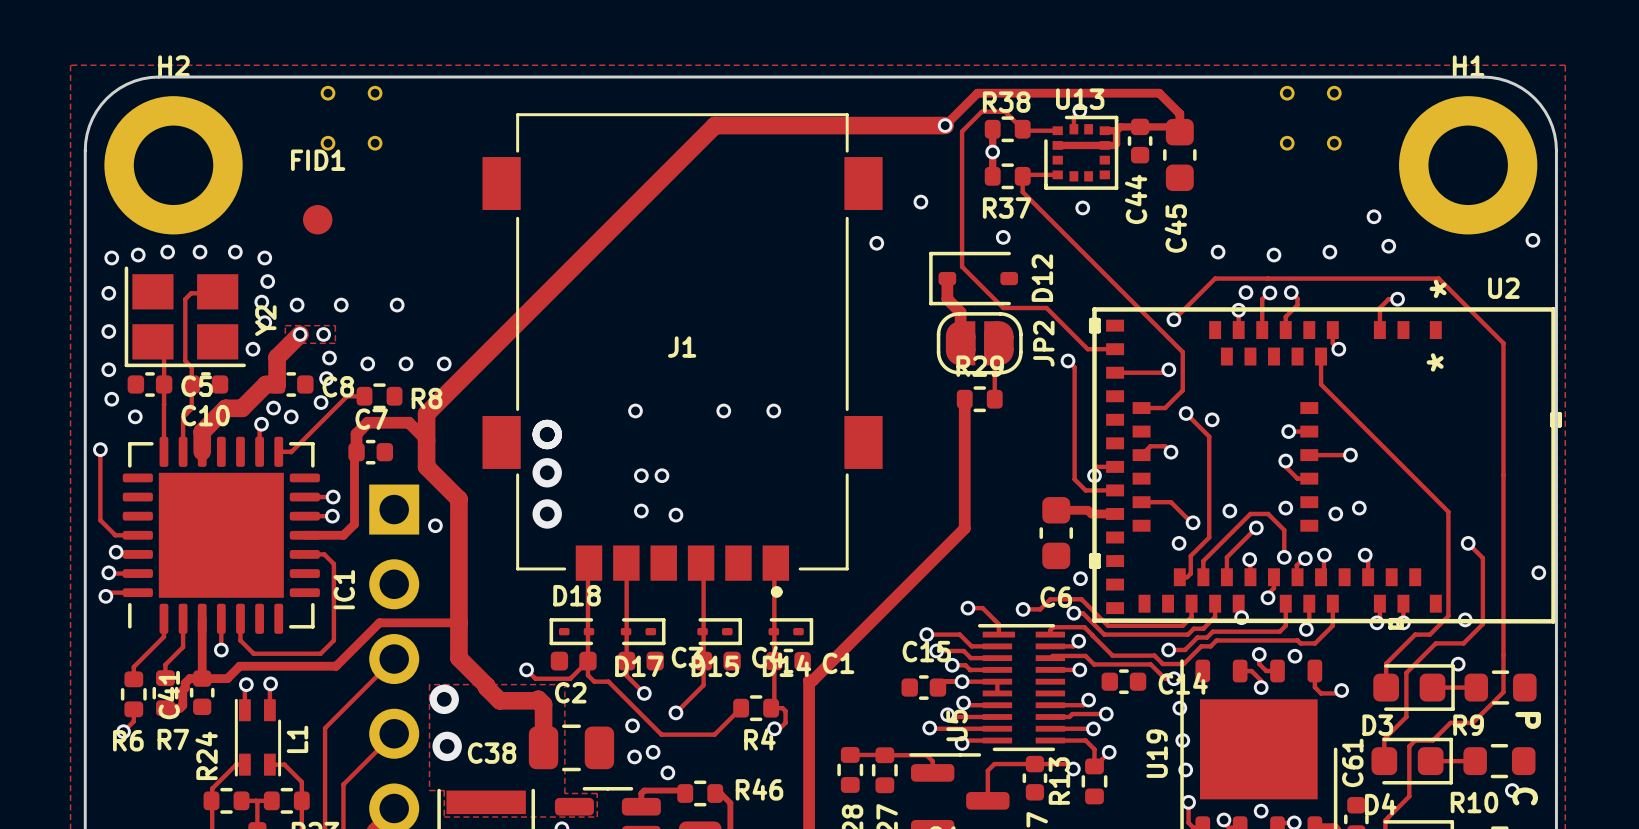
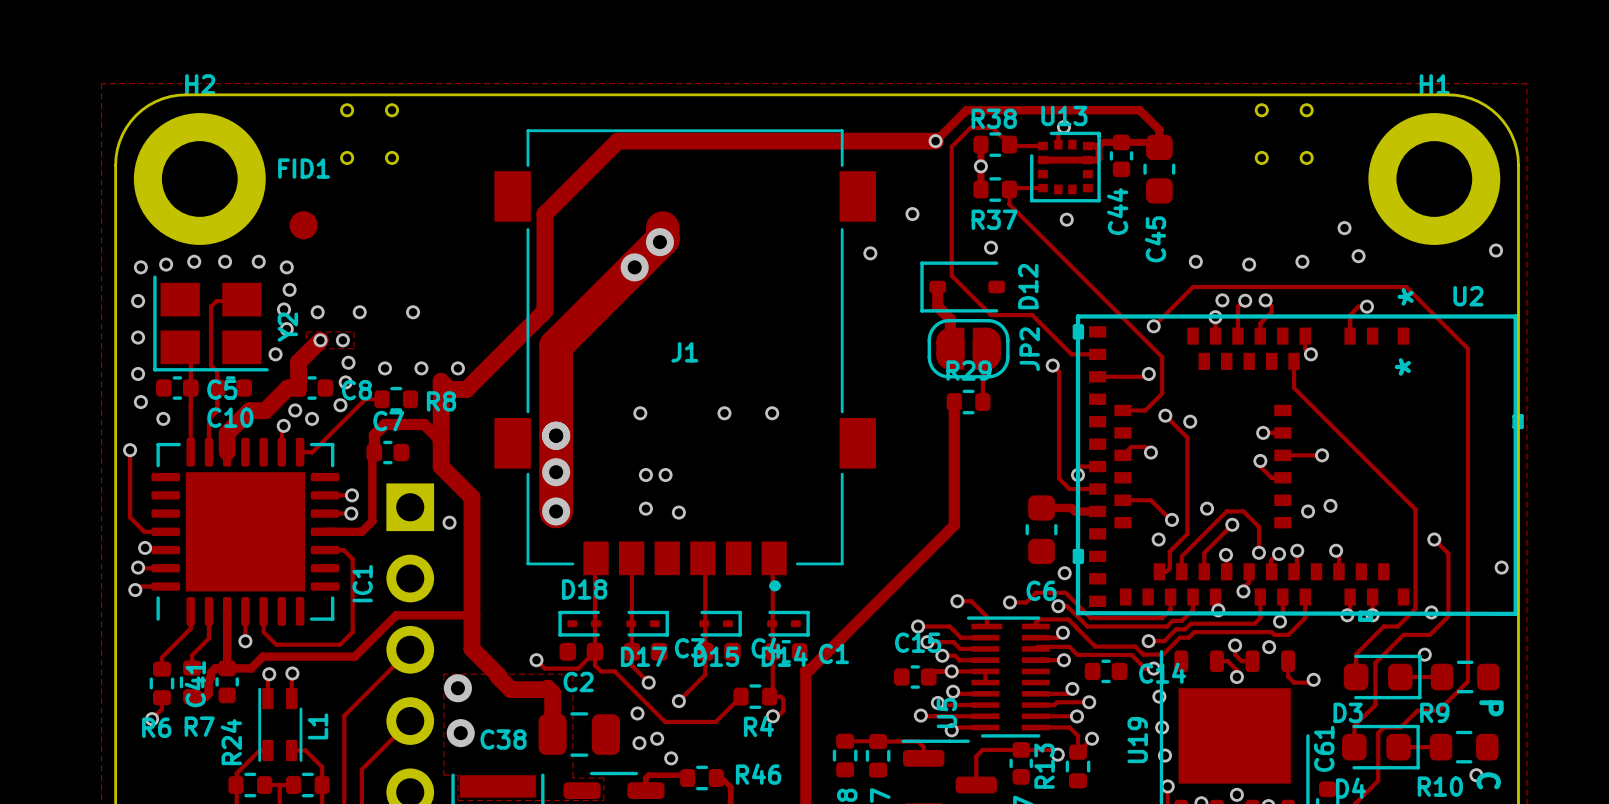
track: (714, 125) (426, 413) -> (716, 141) (617, 141) (544, 214) (544, 311) (466, 389) (449, 389) (441, 381) (441, 416)
track: none -> (662, 228) (662, 239) (556, 345) (556, 511)
FID1 position: (317, 219) -> (303, 225)
via: none -> (659, 242)
via: none -> (634, 267)
via: (1285, 508) -> none

